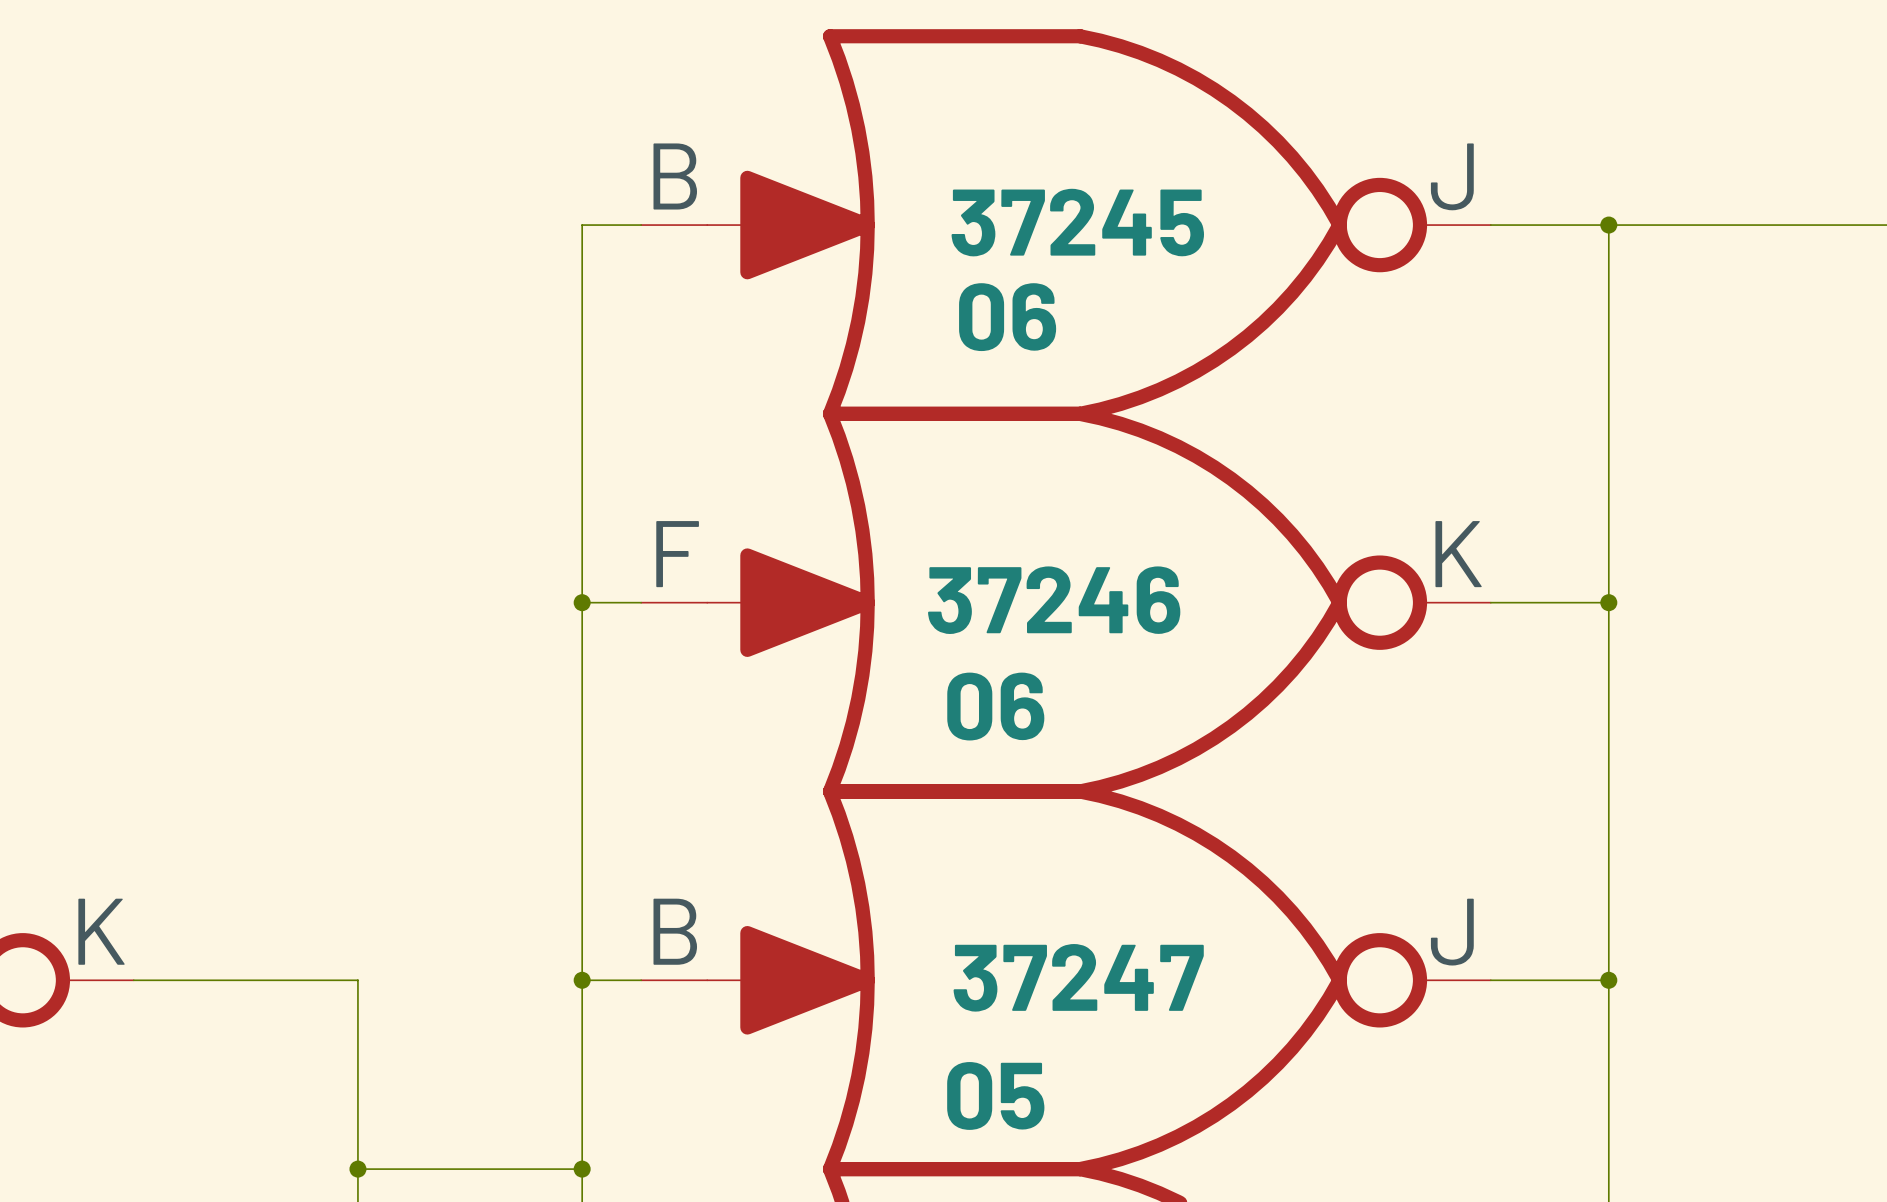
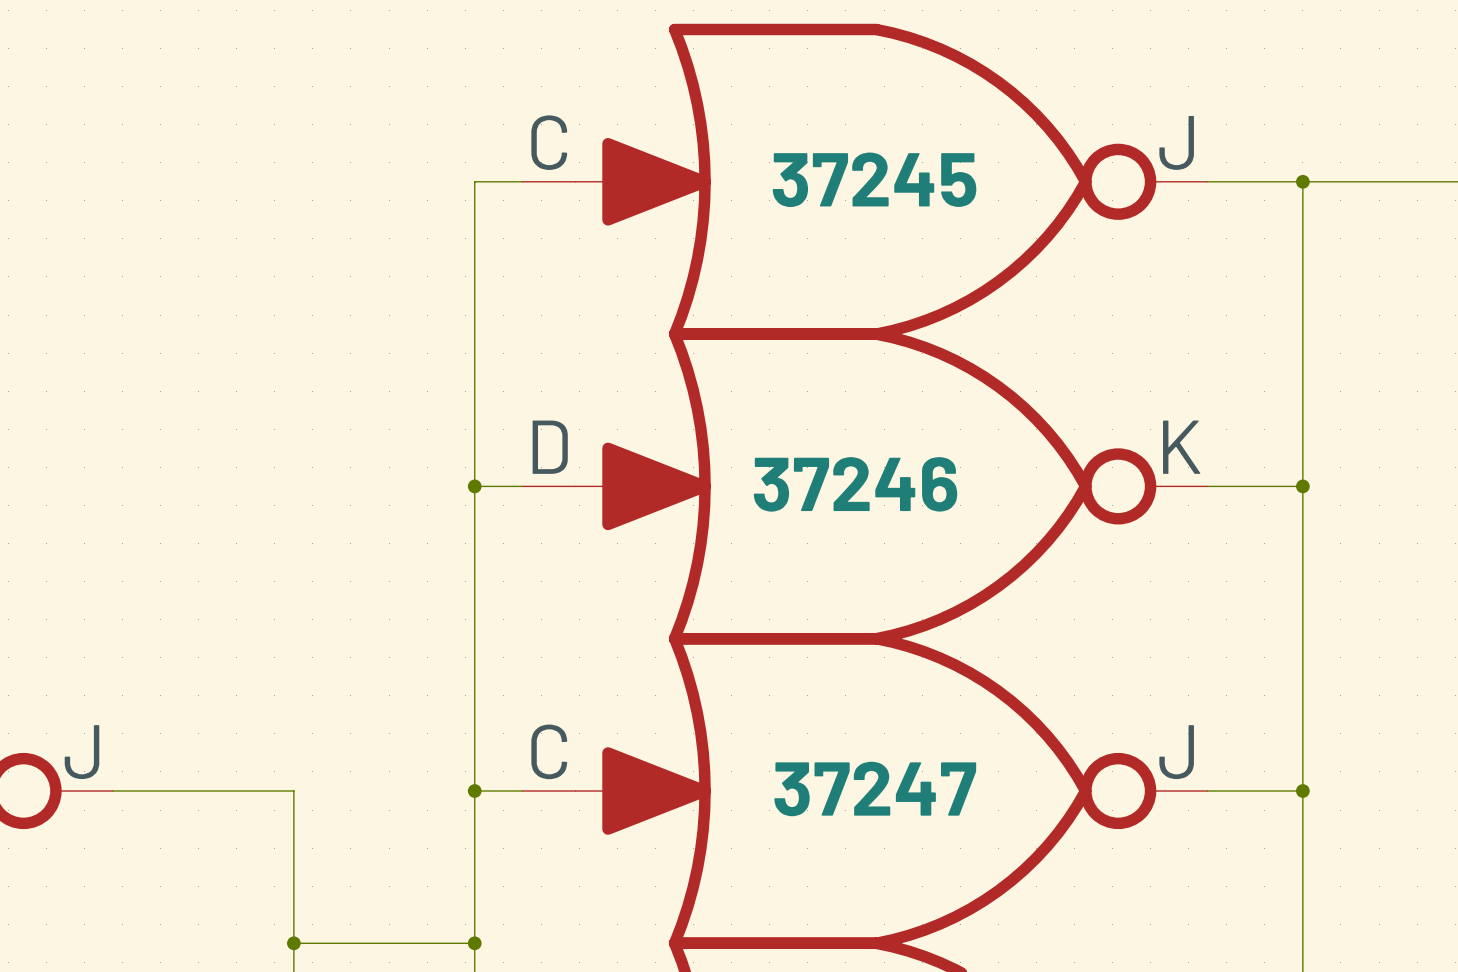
part pin name: B (675, 176) -> C (549, 142)
part text: 06 (1007, 317) -> none
part pin name: F (677, 554) -> D (550, 447)
part text: 06 (995, 706) -> none
part pin name: K (101, 931) -> J (81, 752)
part pin name: B (675, 931) -> C (549, 751)
part text: 05 (995, 1095) -> none

